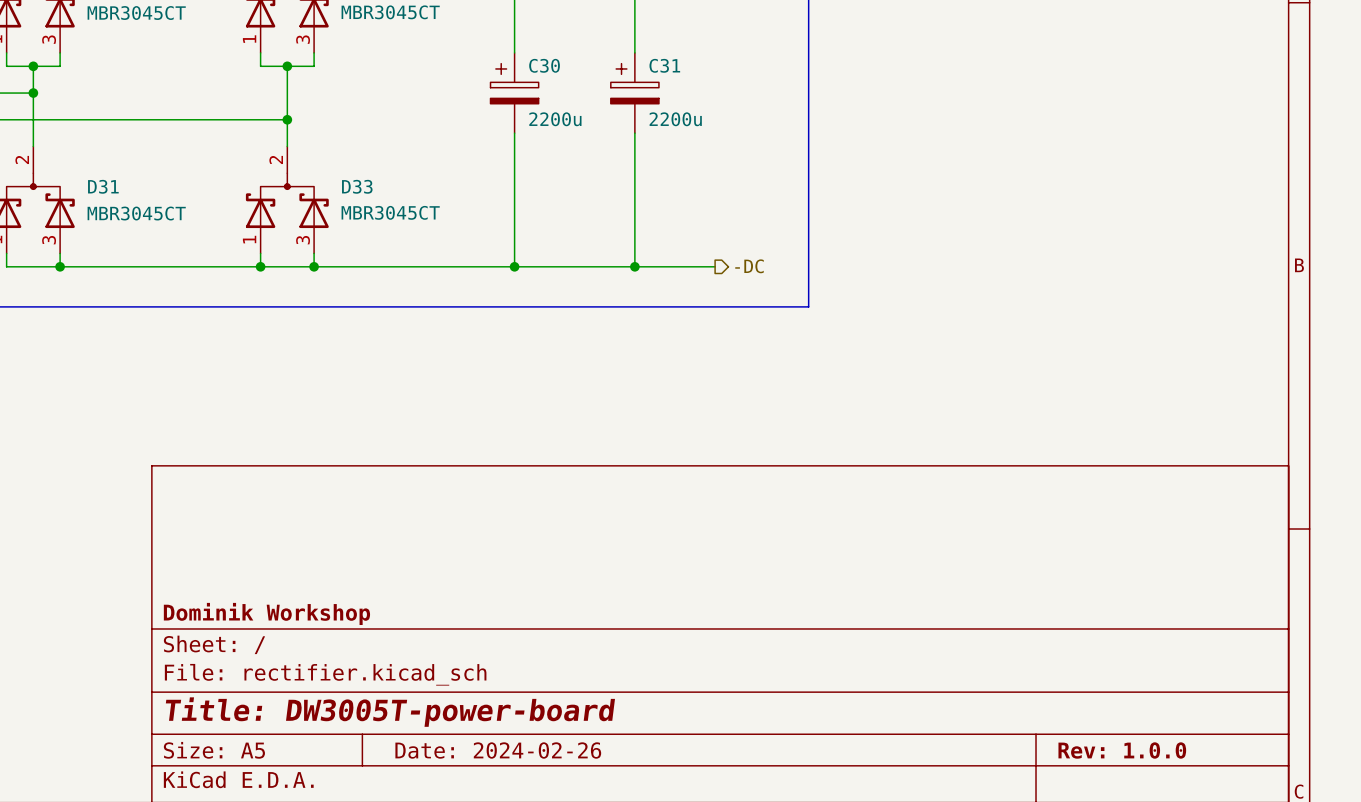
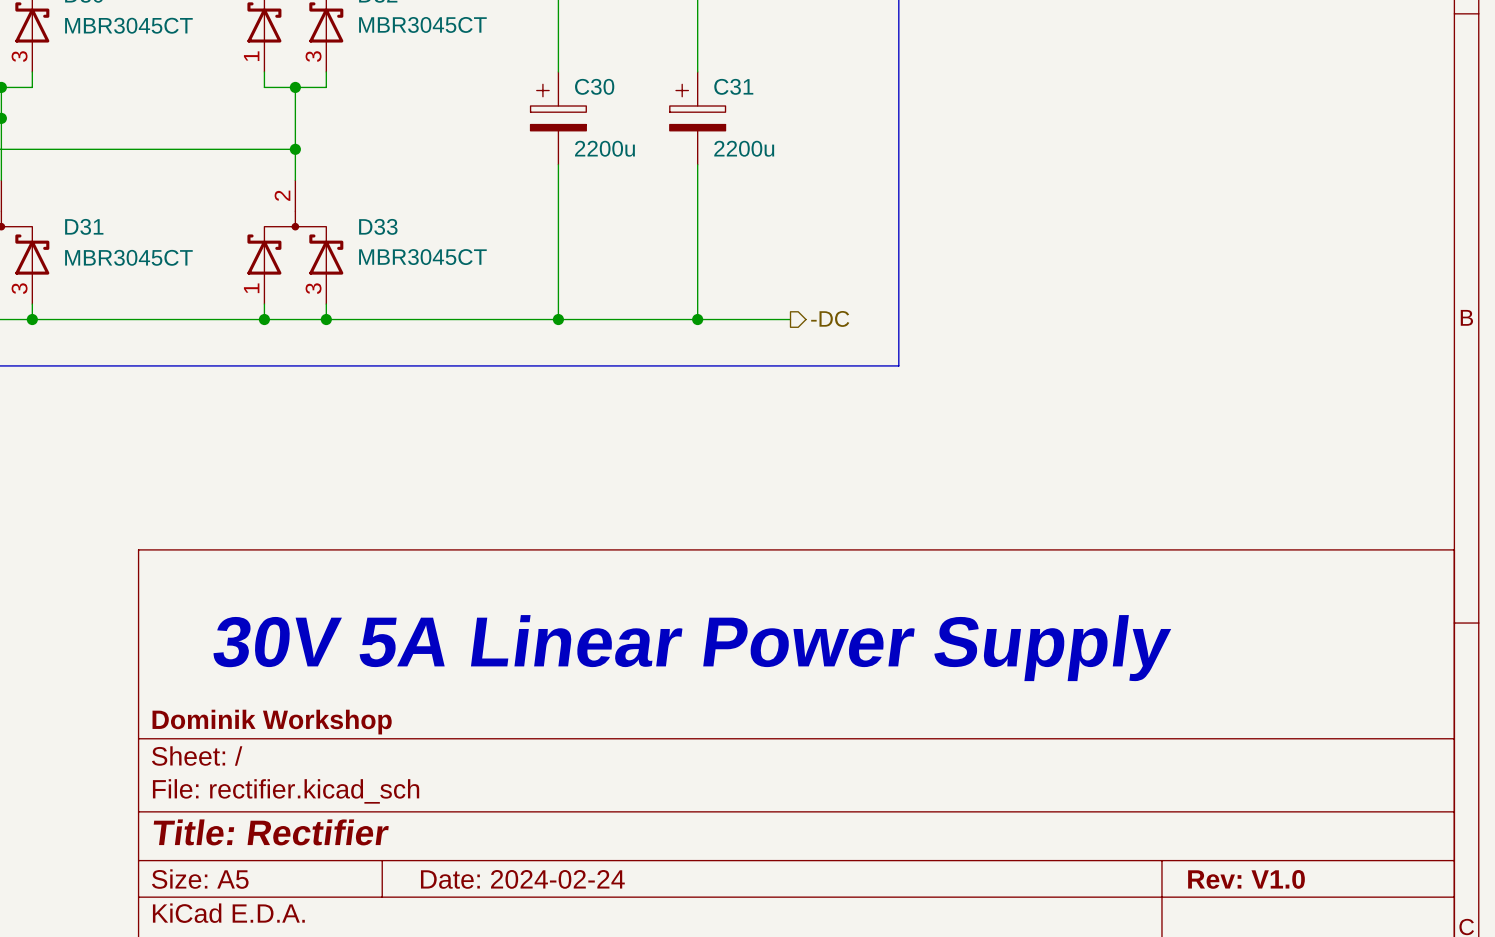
text: none -> 30V 5A Linear Power Supply (692, 648)
title block: Title: DW3005T-power-board (390, 712) -> Title: Rectifier (271, 832)
title block: Date: 2024-02-26 (498, 750) -> Date: 2024-02-24 (522, 879)
title block: Rev: 1.0.0 (1122, 750) -> Rev: V1.0 (1246, 879)

